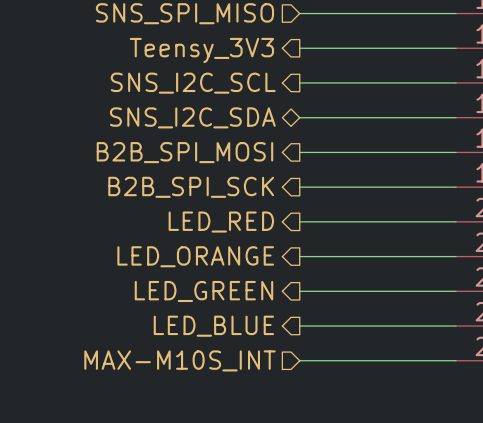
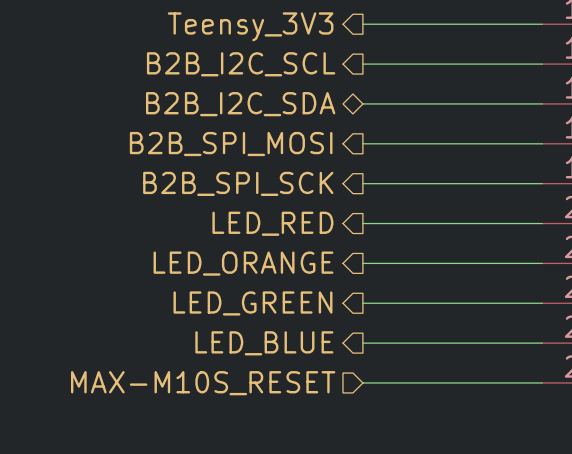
hierarchical label: SNS_I2C_SCL (193, 83) -> B2B_I2C_SCL (241, 64)
hierarchical label: SNS_I2C_SDA (192, 117) -> B2B_I2C_SDA (240, 104)
hierarchical label: MAX-M10S_INT (180, 360) -> MAX-M10S_RESET (203, 383)

